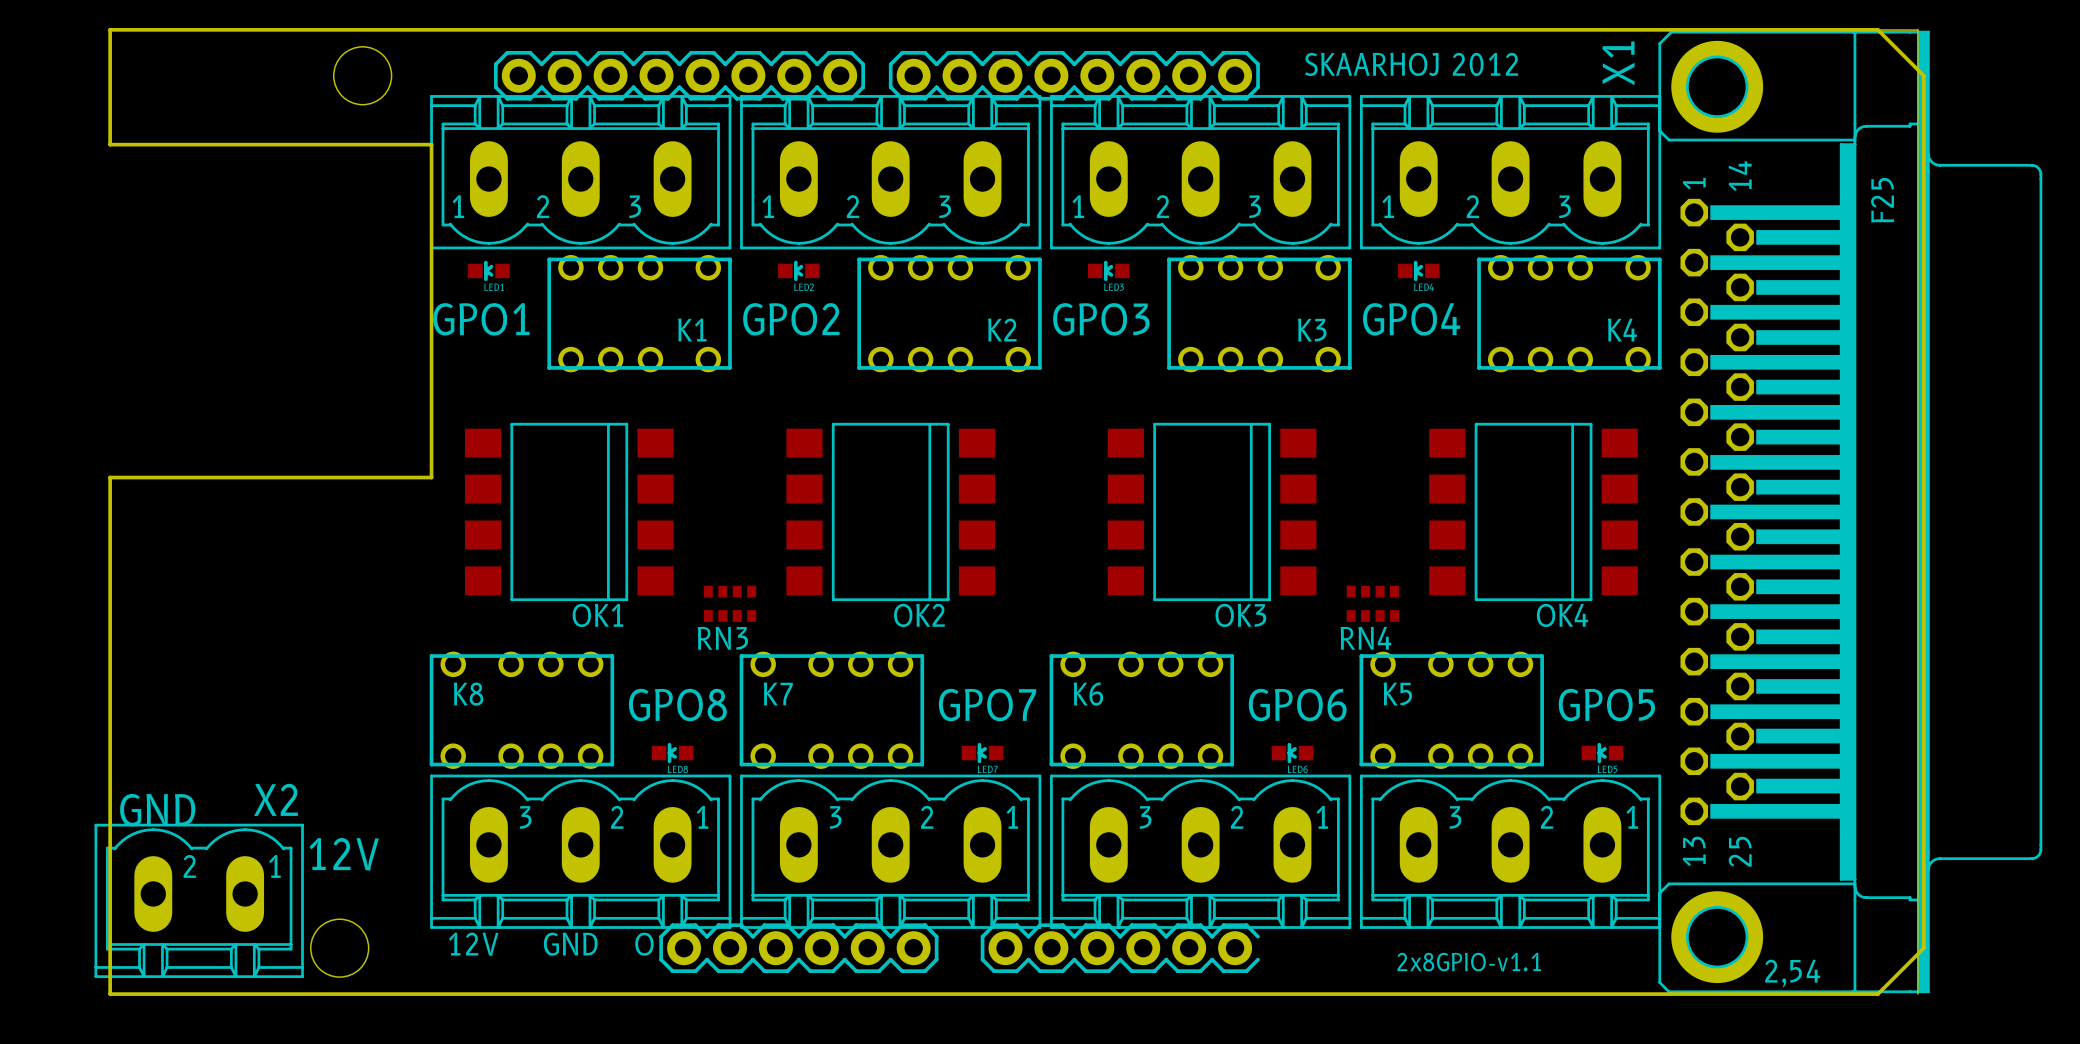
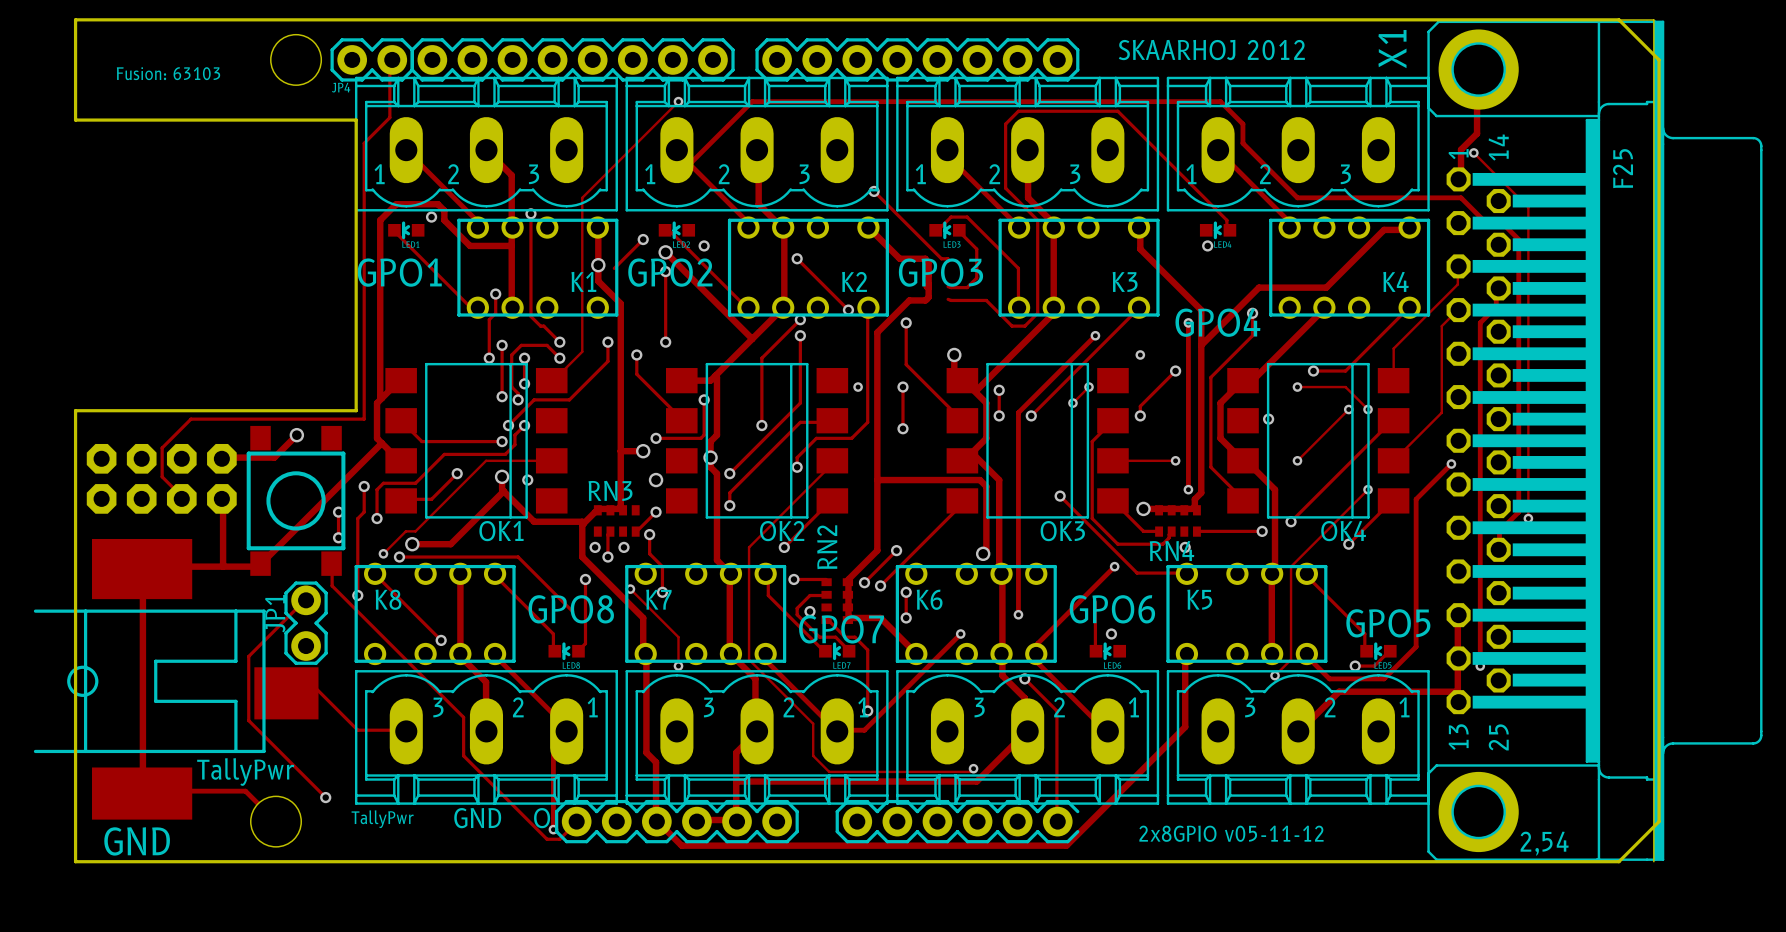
JP4: none -> (372, 59)
track: none -> (392, 59) (389, 59) (389, 117) (364, 143) (364, 419) (191, 419) (162, 447) (162, 476) (181, 496) (181, 498)
track: none -> (1478, 69) (1477, 69) (1477, 133) (1461, 149) (1461, 178) (1458, 179)
text: none -> Fusion: 63103 (168, 73)
track: none -> (678, 101) (582, 197) (582, 351) (551, 380)
via: none -> (678, 101)
track: none -> (406, 150) (476, 220) (477, 227)
track: none -> (486, 150) (511, 175) (512, 307)
track: none -> (757, 150) (758, 152) (758, 204) (784, 229) (784, 306) (710, 380) (681, 380)
track: none -> (947, 150) (944, 152) (1019, 227)
track: none -> (1027, 150) (1028, 197) (1056, 226) (1053, 227) (1053, 229) (1053, 306) (1056, 310) (976, 390) (962, 380)
track: none -> (1218, 150) (1287, 220) (1287, 226) (1289, 227)
track: none -> (1473, 152) (1528, 207) (1528, 518)
via: none -> (1473, 152)
track: none -> (874, 191) (941, 258) (947, 258) (948, 261)
via: none -> (874, 191)
track: none -> (530, 213) (530, 316) (559, 342)
via: none -> (530, 213)
via: none -> (431, 217)
track: none -> (597, 227) (598, 281) (620, 303) (620, 505) (623, 510) (598, 508) (582, 524) (582, 557) (643, 617) (643, 653) (646, 656) (646, 752) (656, 762) (656, 820) (681, 845) (1066, 845) (1185, 727) (1185, 656) (1186, 654)
track: none -> (748, 227) (745, 226) (745, 220) (676, 150) (691, 162) (752, 101) (1220, 101) (1242, 124) (1242, 143) (1297, 197) (1461, 197) (1483, 220) (1499, 220) (1518, 239) (1518, 512) (1499, 531) (1498, 549)
track: none -> (868, 227) (899, 258) (925, 258) (928, 261) (926, 274) (928, 274) (926, 286) (928, 287) (928, 297) (925, 300) (909, 300) (877, 332) (877, 550) (848, 579) (847, 620) (851, 617) (880, 617) (916, 654)
track: none -> (1139, 227) (1140, 249) (1201, 310) (1201, 492) (1194, 499) (1196, 510) (1143, 508)
track: none -> (1409, 227) (1406, 229) (1384, 229) (1326, 287) (1258, 287) (1201, 345)
track: none -> (394, 230) (470, 306) (477, 307)
track: none -> (665, 230) (665, 233) (672, 233) (748, 307)
track: none -> (935, 230) (951, 217) (967, 217) (1018, 268) (1019, 307)
track: none -> (959, 230) (976, 249) (976, 278) (967, 287) (948, 286)
track: none -> (1229, 230) (1226, 229) (1226, 220) (1117, 111) (1018, 111) (1005, 124) (1005, 188) (1037, 220) (1037, 313) (1024, 326) (1012, 326) (986, 300) (948, 299)
track: none -> (643, 239) (614, 268)
via: none -> (643, 239)
track: none -> (511, 245) (470, 245) (444, 220) (444, 210) (437, 204) (396, 204) (380, 220) (380, 396) (381, 398)
via: none -> (704, 245)
via: none -> (1207, 245)
track: none -> (665, 252) (752, 338)
via: none -> (665, 252)
track: none -> (797, 258) (848, 310)
via: none -> (797, 258)
via: none -> (598, 265)
track: none -> (1458, 266) (1457, 284) (1393, 348) (1393, 380)
track: none -> (665, 271) (665, 342)
via: none -> (665, 271)
GPO4 name position: GPO4 (1411, 319) -> GPO4 (1217, 322)
track: none -> (1498, 288) (1496, 290) (1496, 306) (1480, 322) (1480, 666)
track: none -> (495, 294) (495, 313) (489, 319) (489, 358)
via: none -> (495, 294)
track: none -> (868, 307) (867, 422) (851, 438) (816, 438) (797, 457) (797, 467)
track: none -> (1139, 307) (1031, 415)
track: none -> (1324, 307) (1252, 380) (1242, 380) (1220, 403) (1220, 438) (1275, 489) (1275, 573) (1271, 576) (1272, 654)
track: none -> (1409, 307) (1345, 371) (1313, 371)
via: none -> (848, 310)
track: none -> (1458, 310) (1441, 326) (1441, 412) (1393, 460)
track: none -> (1252, 313) (1252, 335) (1210, 377) (1210, 467) (1243, 500)
via: none -> (1252, 313)
track: none -> (800, 319) (761, 358) (761, 425)
via: none -> (800, 319)
track: none -> (906, 322) (906, 364) (962, 420)
via: none -> (906, 322)
track: none -> (1188, 322) (1188, 489)
via: none -> (1188, 322)
track: none -> (800, 335) (800, 403) (729, 473)
via: none -> (800, 335)
track: none -> (1095, 335) (1018, 412) (1018, 614)
via: none -> (1095, 335)
via: none -> (559, 342)
track: none -> (607, 342) (607, 361) (569, 399) (534, 399) (508, 425)
via: none -> (607, 342)
via: none -> (665, 342)
track: none -> (502, 345) (502, 396)
via: none -> (502, 345)
track: none -> (636, 354) (636, 374) (681, 420)
via: none -> (636, 354)
track: none -> (954, 354) (954, 374) (960, 380) (963, 380) (986, 403) (986, 438) (962, 460) (973, 454) (999, 480) (999, 573) (1002, 576) (1002, 675) (1024, 698) (1024, 730) (1027, 731) (976, 781) (736, 781)
via: none -> (954, 354)
via: none -> (1140, 354)
via: none -> (489, 358)
track: none -> (524, 358) (524, 383)
via: none -> (524, 358)
track: none -> (559, 358) (547, 345) (521, 345) (511, 354) (511, 387) (518, 393) (518, 399)
via: none -> (559, 358)
track: none -> (1175, 371) (1140, 406) (1140, 415)
via: none -> (1175, 371)
via: none -> (1313, 371)
track: none -> (715, 375) (716, 377) (716, 435) (710, 441) (710, 467) (716, 473) (716, 560) (730, 573) (729, 653) (755, 678) (755, 730) (757, 731) (736, 752) (737, 821) (736, 820) (697, 820) (696, 821)
track: none -> (401, 380) (377, 403) (377, 438) (401, 460)
via: none -> (524, 383)
via: none -> (858, 387)
track: none -> (902, 387) (902, 428)
via: none -> (902, 387)
track: none -> (1089, 387) (1072, 403)
via: none -> (1089, 387)
track: none -> (1297, 387) (1345, 387) (1368, 409)
via: none -> (1297, 387)
track: none -> (999, 390) (999, 415)
via: none -> (999, 390)
via: none -> (502, 396)
via: none -> (518, 399)
track: none -> (704, 399) (704, 435) (700, 438) (656, 438)
via: none -> (704, 399)
via: none -> (1072, 403)
track: none -> (1348, 409) (1297, 460)
via: none -> (1348, 409)
via: none -> (1368, 409)
via: none -> (999, 415)
via: none -> (1031, 415)
via: none -> (1140, 415)
via: none -> (1268, 419)
track: none -> (401, 420) (421, 441) (502, 441)
track: none -> (832, 420) (800, 422) (729, 492) (729, 505)
track: none -> (1112, 420) (1092, 441) (1092, 518) (1117, 544) (1162, 544) (1169, 537) (1171, 531)
track: none -> (1393, 420) (1291, 521)
via: none -> (508, 425)
track: none -> (524, 425) (514, 435) (514, 444) (505, 454) (444, 454) (415, 483) (383, 483) (377, 489) (377, 518)
via: none -> (524, 425)
via: none -> (761, 425)
via: none -> (902, 428)
track: none -> (296, 435) (274, 457) (221, 458)
via: none -> (296, 435)
via: none -> (656, 438)
via: none -> (502, 441)
track: none -> (381, 443) (258, 566) (142, 566) (142, 791)
track: none -> (620, 451) (643, 451)
via: none -> (643, 451)
via: none -> (710, 457)
track: none -> (551, 460) (486, 460) (415, 531) (405, 531) (383, 553)
track: none -> (832, 460) (829, 460) (829, 467) (749, 547) (749, 659) (813, 723) (813, 755) (829, 771) (970, 771) (973, 768)
track: none -> (1112, 460) (1175, 460)
via: none -> (1175, 460)
via: none -> (1297, 460)
track: none -> (1451, 464) (1416, 499) (1416, 646) (1384, 678) (1329, 678) (1306, 654)
via: none -> (1451, 464)
via: none -> (797, 467)
track: none -> (457, 473) (431, 499) (402, 499) (401, 500)
via: none -> (457, 473)
via: none -> (729, 473)
track: none -> (502, 476) (502, 489) (534, 521) (582, 521) (583, 523)
via: none -> (502, 476)
part: none -> (161, 478)
via: none -> (527, 480)
via: none -> (656, 480)
track: none -> (877, 480) (979, 480) (986, 486) (986, 550) (983, 553)
track: none -> (364, 486) (364, 512) (357, 518) (357, 595)
via: none -> (364, 486)
via: none -> (1188, 489)
track: none -> (1368, 489) (1291, 566) (1291, 659) (1275, 675)
via: none -> (1368, 489)
track: none -> (503, 491) (450, 544) (412, 544)
track: none -> (1060, 496) (1137, 573) (1186, 573)
via: none -> (1060, 496)
track: none -> (221, 498) (223, 566)
part: none -> (296, 500)
track: none -> (832, 500) (784, 547)
track: none -> (962, 500) (963, 502) (880, 585)
track: none -> (1112, 500) (1143, 531) (1159, 531)
track: none -> (1393, 500) (1348, 544)
via: none -> (729, 505)
via: none -> (1143, 508)
track: none -> (338, 512) (338, 537)
via: none -> (338, 512)
track: none -> (656, 512) (635, 531)
via: none -> (656, 512)
via: none -> (377, 518)
via: none -> (1528, 518)
via: none -> (1291, 521)
track: none -> (1262, 531) (1196, 531)
via: none -> (1262, 531)
track: none -> (610, 531) (607, 534) (607, 557)
track: none -> (649, 534) (649, 553) (662, 566) (662, 592)
via: none -> (649, 534)
via: none -> (338, 537)
via: none -> (412, 544)
via: none -> (1348, 544)
via: none -> (595, 547)
via: none -> (623, 547)
via: none -> (784, 547)
via: none -> (1185, 547)
track: none -> (896, 550) (864, 582)
via: none -> (896, 550)
RN3 name position: RN3 (722, 638) -> RN3 (610, 490)
via: none -> (383, 553)
via: none -> (983, 553)
track: none -> (399, 557) (518, 557) (572, 611)
via: none -> (399, 557)
via: none -> (607, 557)
track: none -> (331, 563) (332, 585) (463, 717) (463, 755) (547, 839) (559, 839) (576, 821)
track: none -> (1114, 566) (1037, 643) (1036, 654) (1037, 662) (1107, 731)
via: none -> (1114, 566)
track: none -> (375, 573) (441, 640)
track: none -> (460, 573) (460, 656) (486, 682) (486, 731)
track: none -> (495, 573) (553, 634) (554, 651)
track: none -> (765, 573) (768, 576) (768, 595) (825, 651)
track: none -> (1306, 573) (1307, 576) (1364, 634) (1364, 650) (1366, 651)
track: none -> (585, 579) (585, 643) (578, 651)
via: none -> (585, 579)
track: none -> (793, 579) (826, 579) (826, 582)
via: none -> (793, 579)
via: none -> (864, 582)
via: none -> (880, 585)
track: none -> (630, 589) (678, 637) (678, 666)
via: none -> (630, 589)
via: none -> (662, 592)
track: none -> (906, 592) (906, 617)
via: none -> (906, 592)
track: none -> (826, 594) (809, 595) (797, 608) (797, 614) (819, 637) (835, 637) (849, 651)
via: none -> (357, 595)
track: none -> (306, 600) (248, 656) (248, 720) (325, 797)
RN2: none -> (837, 601)
track: none -> (1095, 601) (1096, 651)
GPO7 name position: GPO7 (987, 705) -> GPO7 (841, 629)
GPO5 name position: GPO5 (1606, 705) -> GPO5 (1388, 623)
via: none -> (809, 611)
via: none -> (1018, 614)
track: none -> (1458, 615) (1458, 702) (1457, 691) (1339, 691) (1298, 731)
via: none -> (906, 617)
track: none -> (826, 620) (845, 637) (854, 637) (867, 650) (867, 710)
JP1: none -> (306, 623)
track: none -> (960, 634) (864, 730) (835, 730) (768, 662) (768, 656) (765, 654)
via: none -> (960, 634)
via: none -> (1111, 634)
via: none -> (441, 640)
track: none -> (1390, 651) (1374, 666) (1355, 666)
track: none -> (495, 654) (569, 730) (566, 731) (553, 717) (553, 829)
via: none -> (678, 666)
via: none -> (1355, 666)
via: none -> (1480, 666)
track: none -> (303, 675) (357, 730) (406, 731)
via: none -> (1275, 675)
track: none -> (1024, 678) (1056, 710) (1057, 821)
via: none -> (1024, 678)
part: none -> (176, 679)
text position: GND (157, 810) -> GND (137, 841)
via: none -> (867, 710)
text: 12V (344, 854) -> none
via: none -> (973, 768)
text: none -> TallyPwr (245, 772)
X2: (199, 900) -> none
track: none -> (142, 791) (245, 791) (276, 821)
via: none -> (325, 797)
text: 12V (473, 944) -> none
text: none -> TallyPwr (382, 819)
via: none -> (553, 829)
text: 2x8GPIO-v1.1 (1469, 962) -> 2x8GPIO v05-11-12 (1231, 833)

